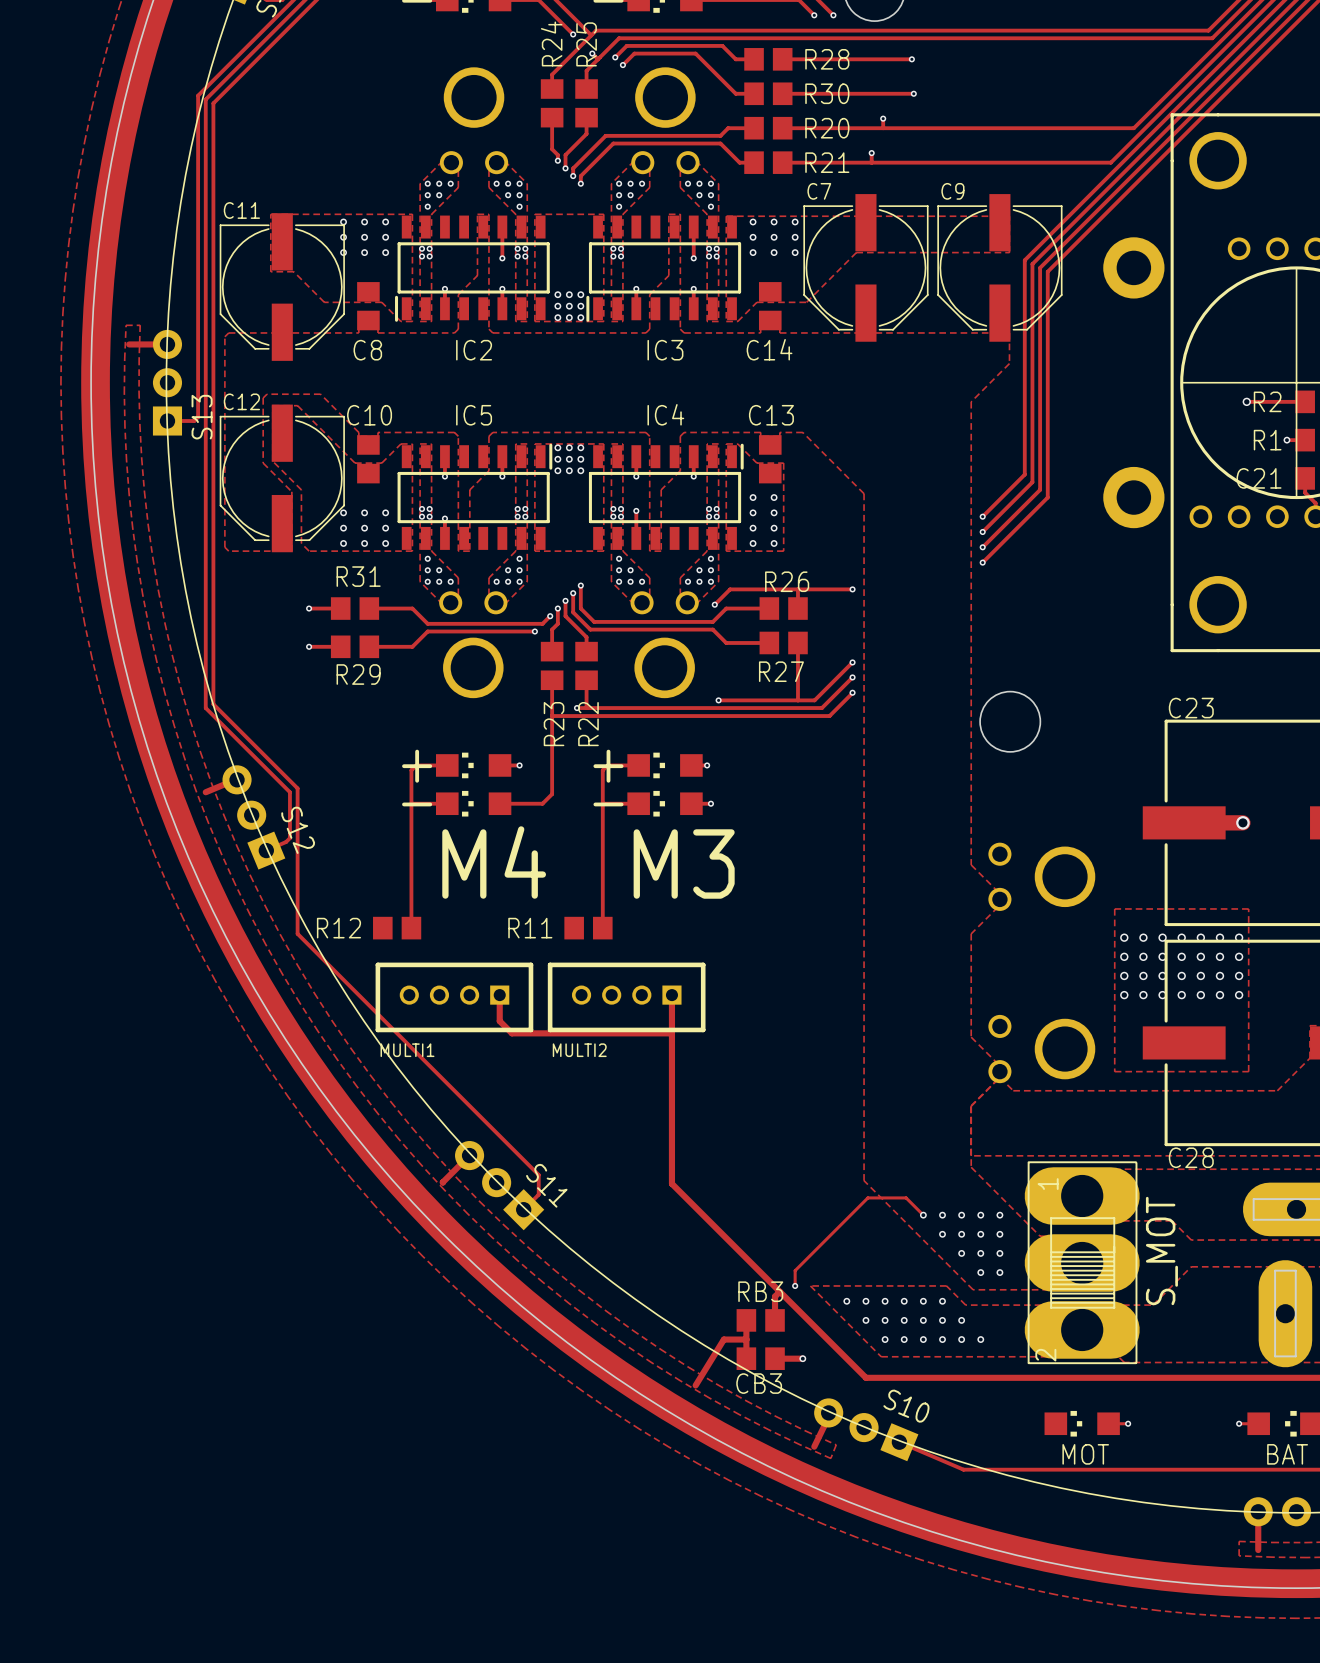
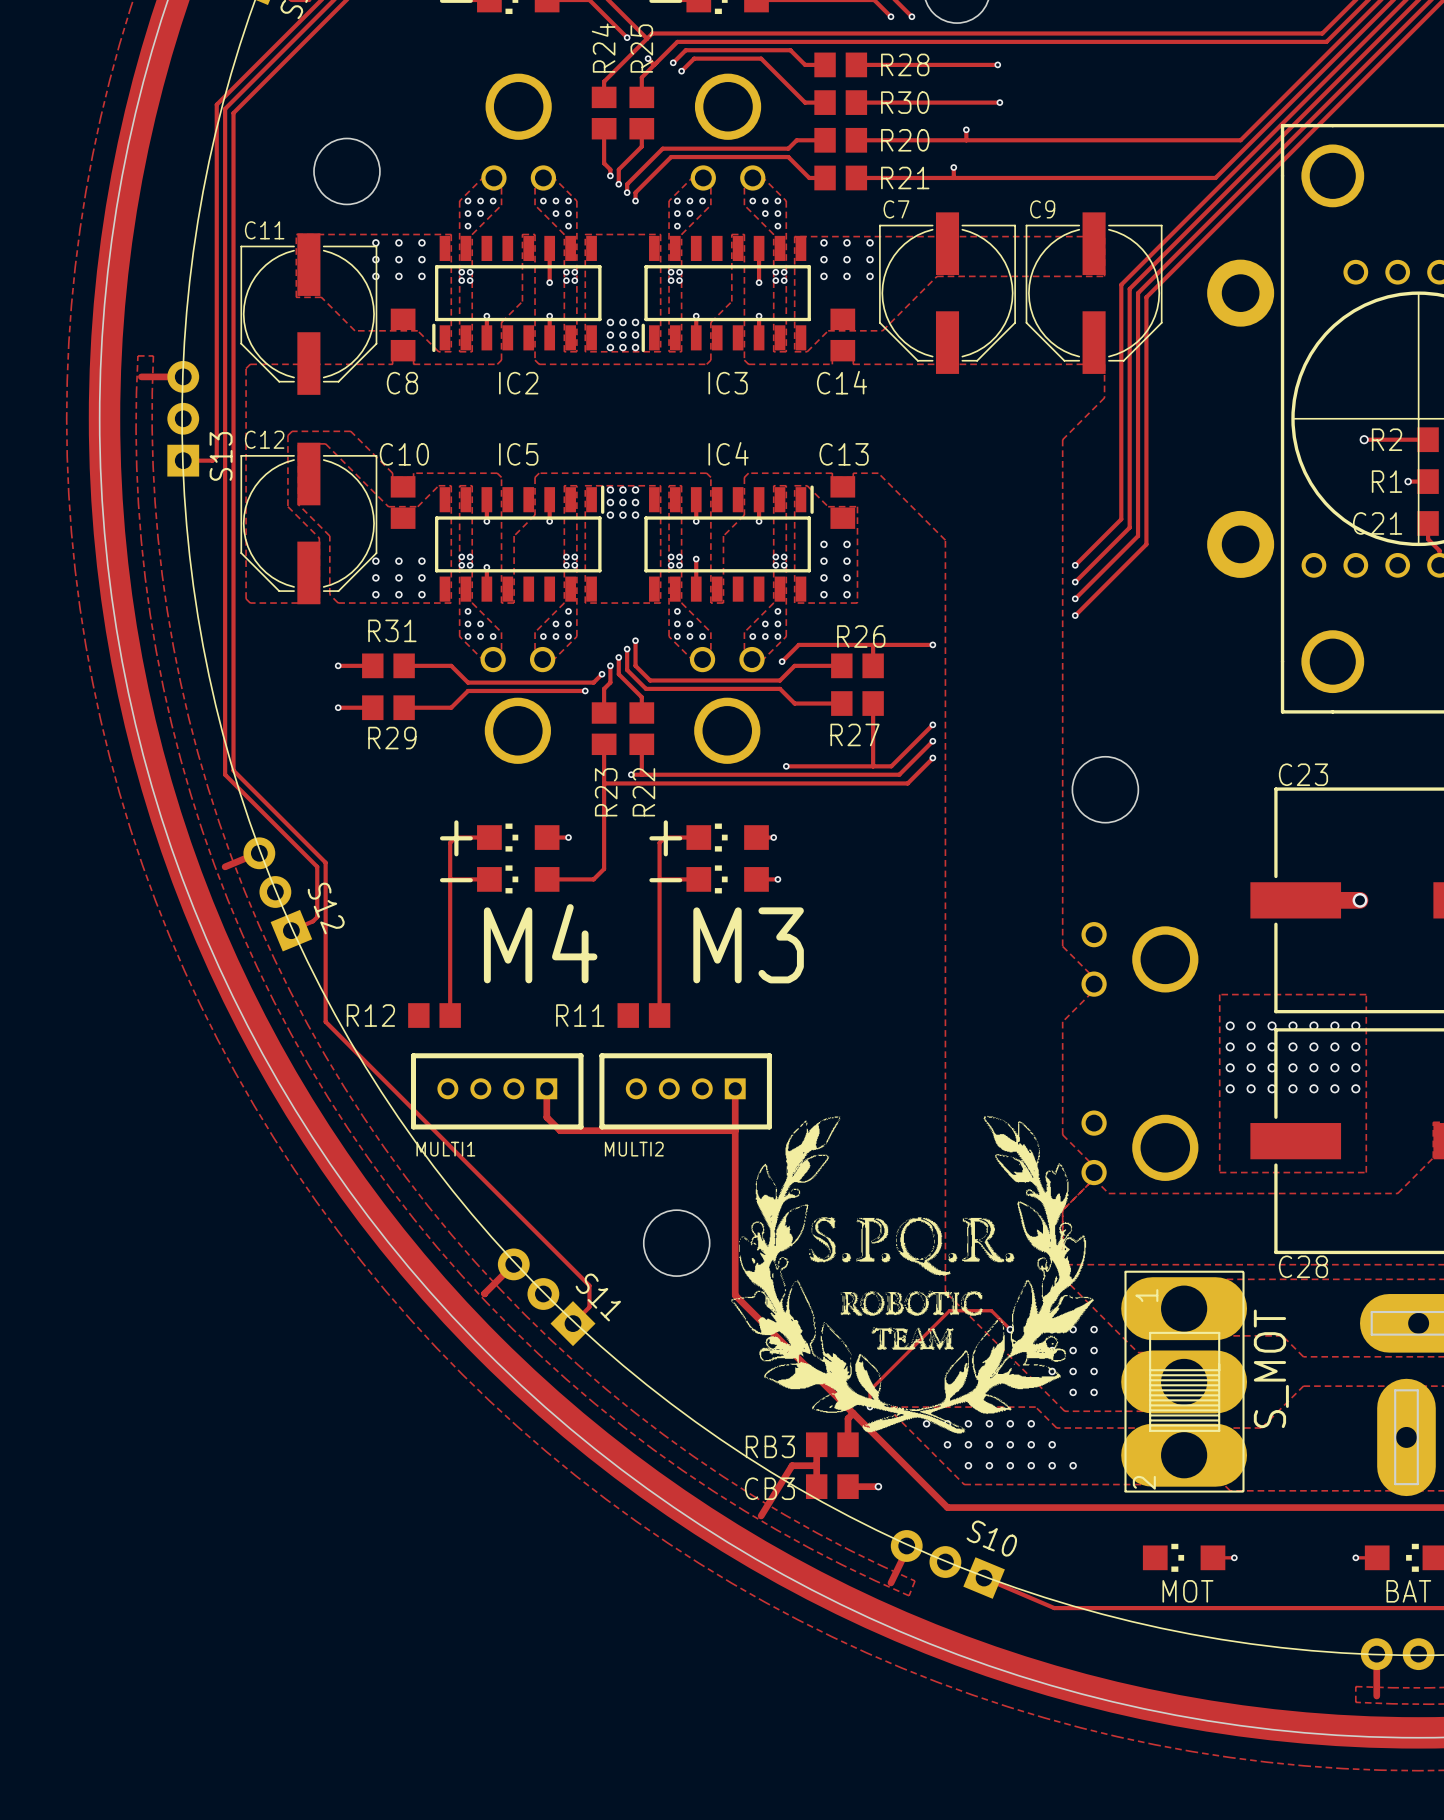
round board edge: none -> [313, 138, 381, 205]
drawing: none -> [731, 1115, 1094, 1434]
round board edge: none -> [643, 1209, 710, 1277]
RB3 name position: RB3 (760, 1291) -> RB3 (770, 1446)
CB3 name position: CB3 (759, 1383) -> CB3 (769, 1488)

